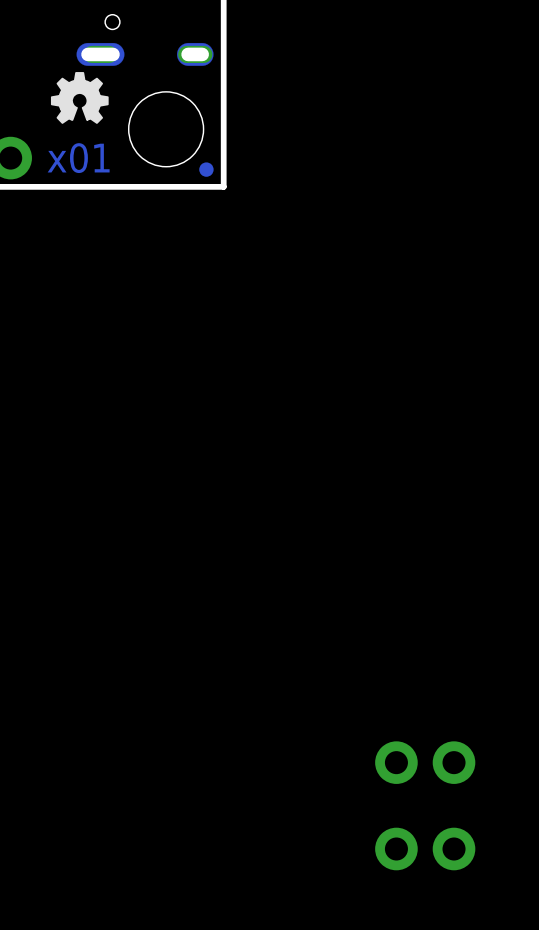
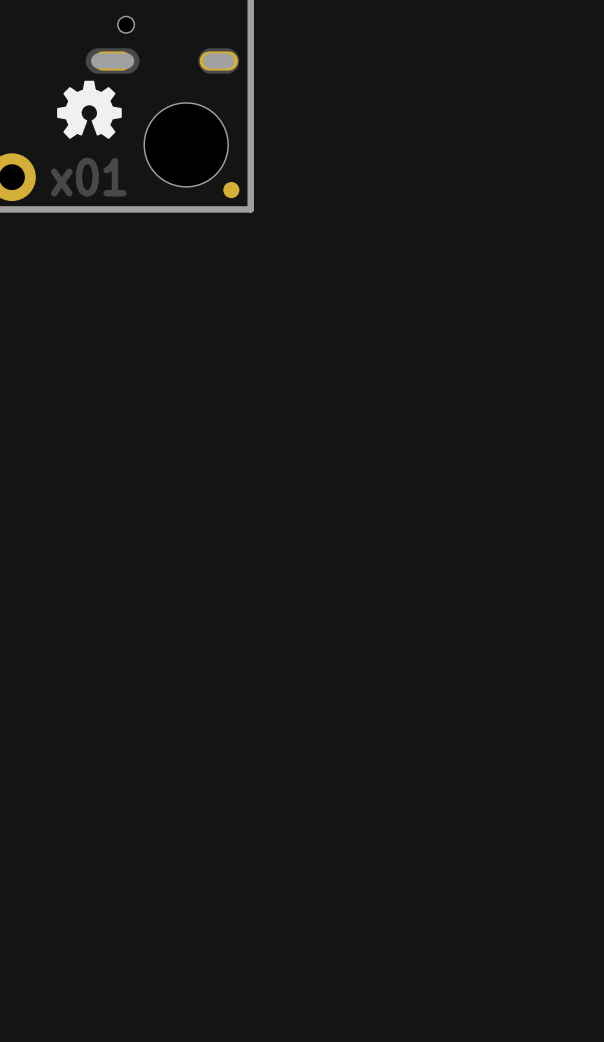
part: (425, 762) -> none
part: (425, 849) -> none

